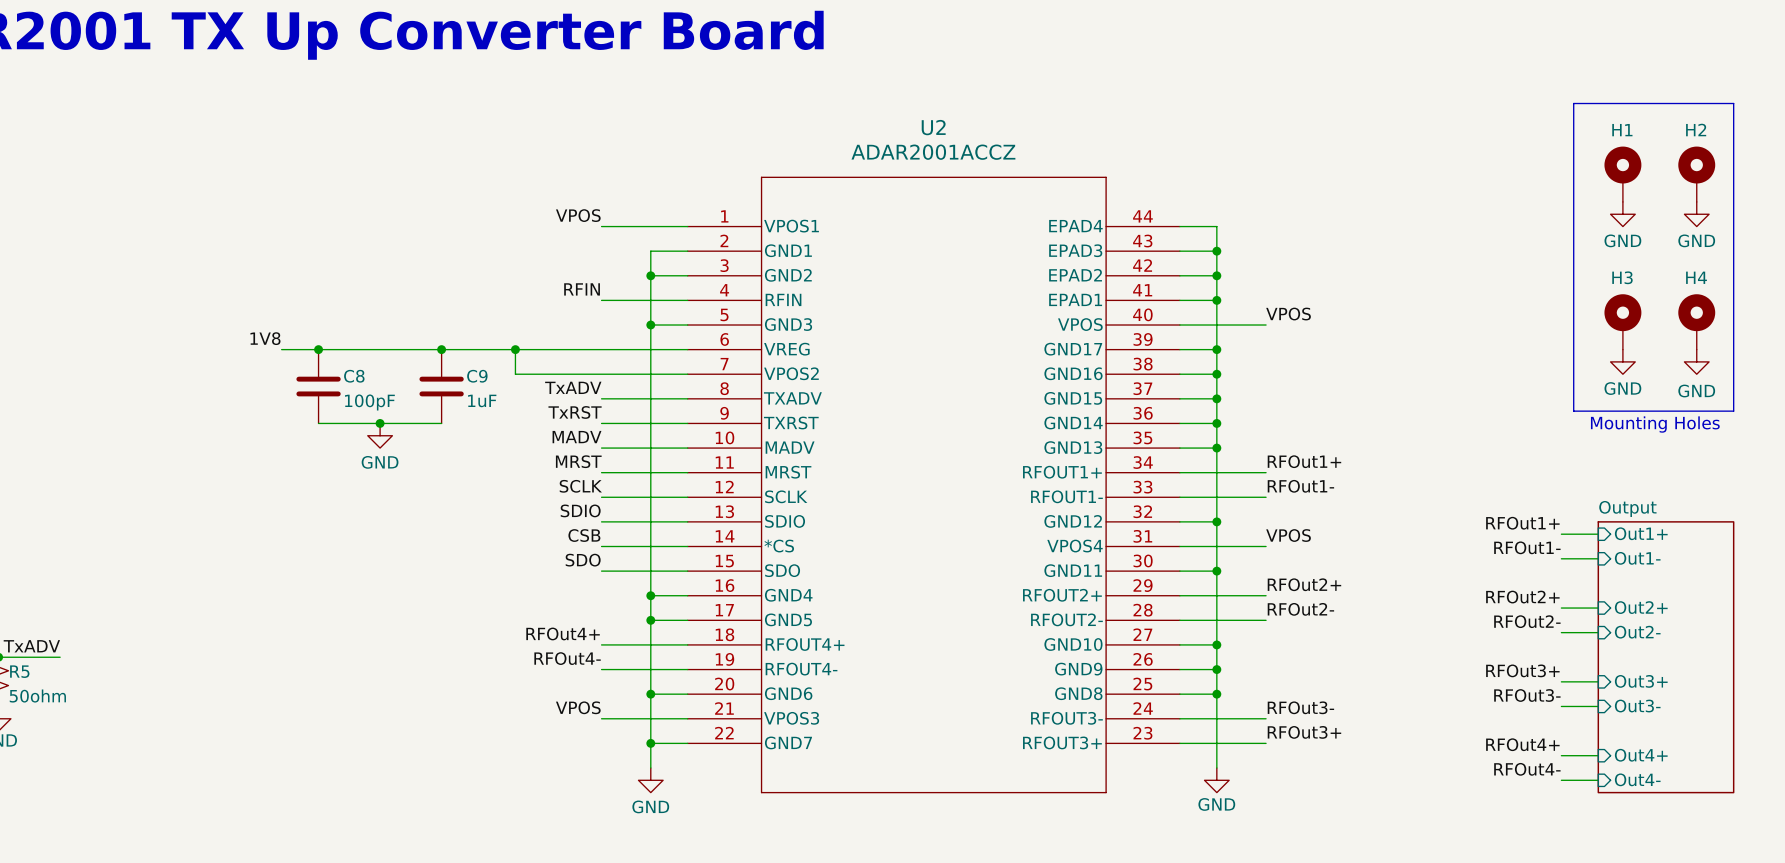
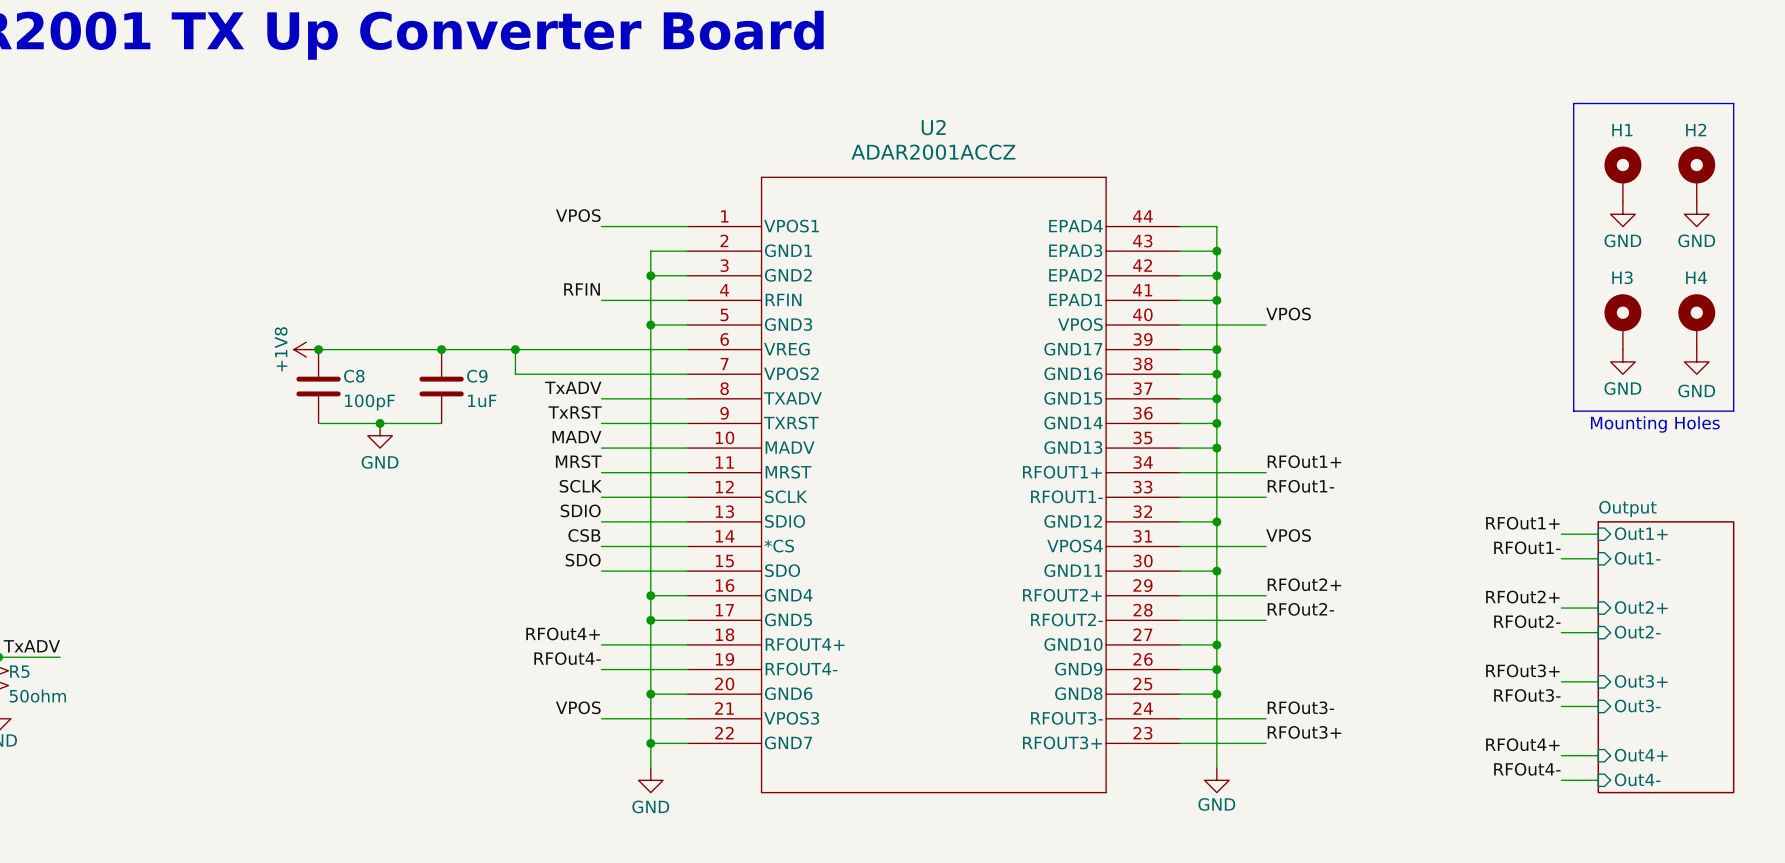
label: 1V8 (265, 338) -> none
power symbol: none -> +1V8 (306, 349)

